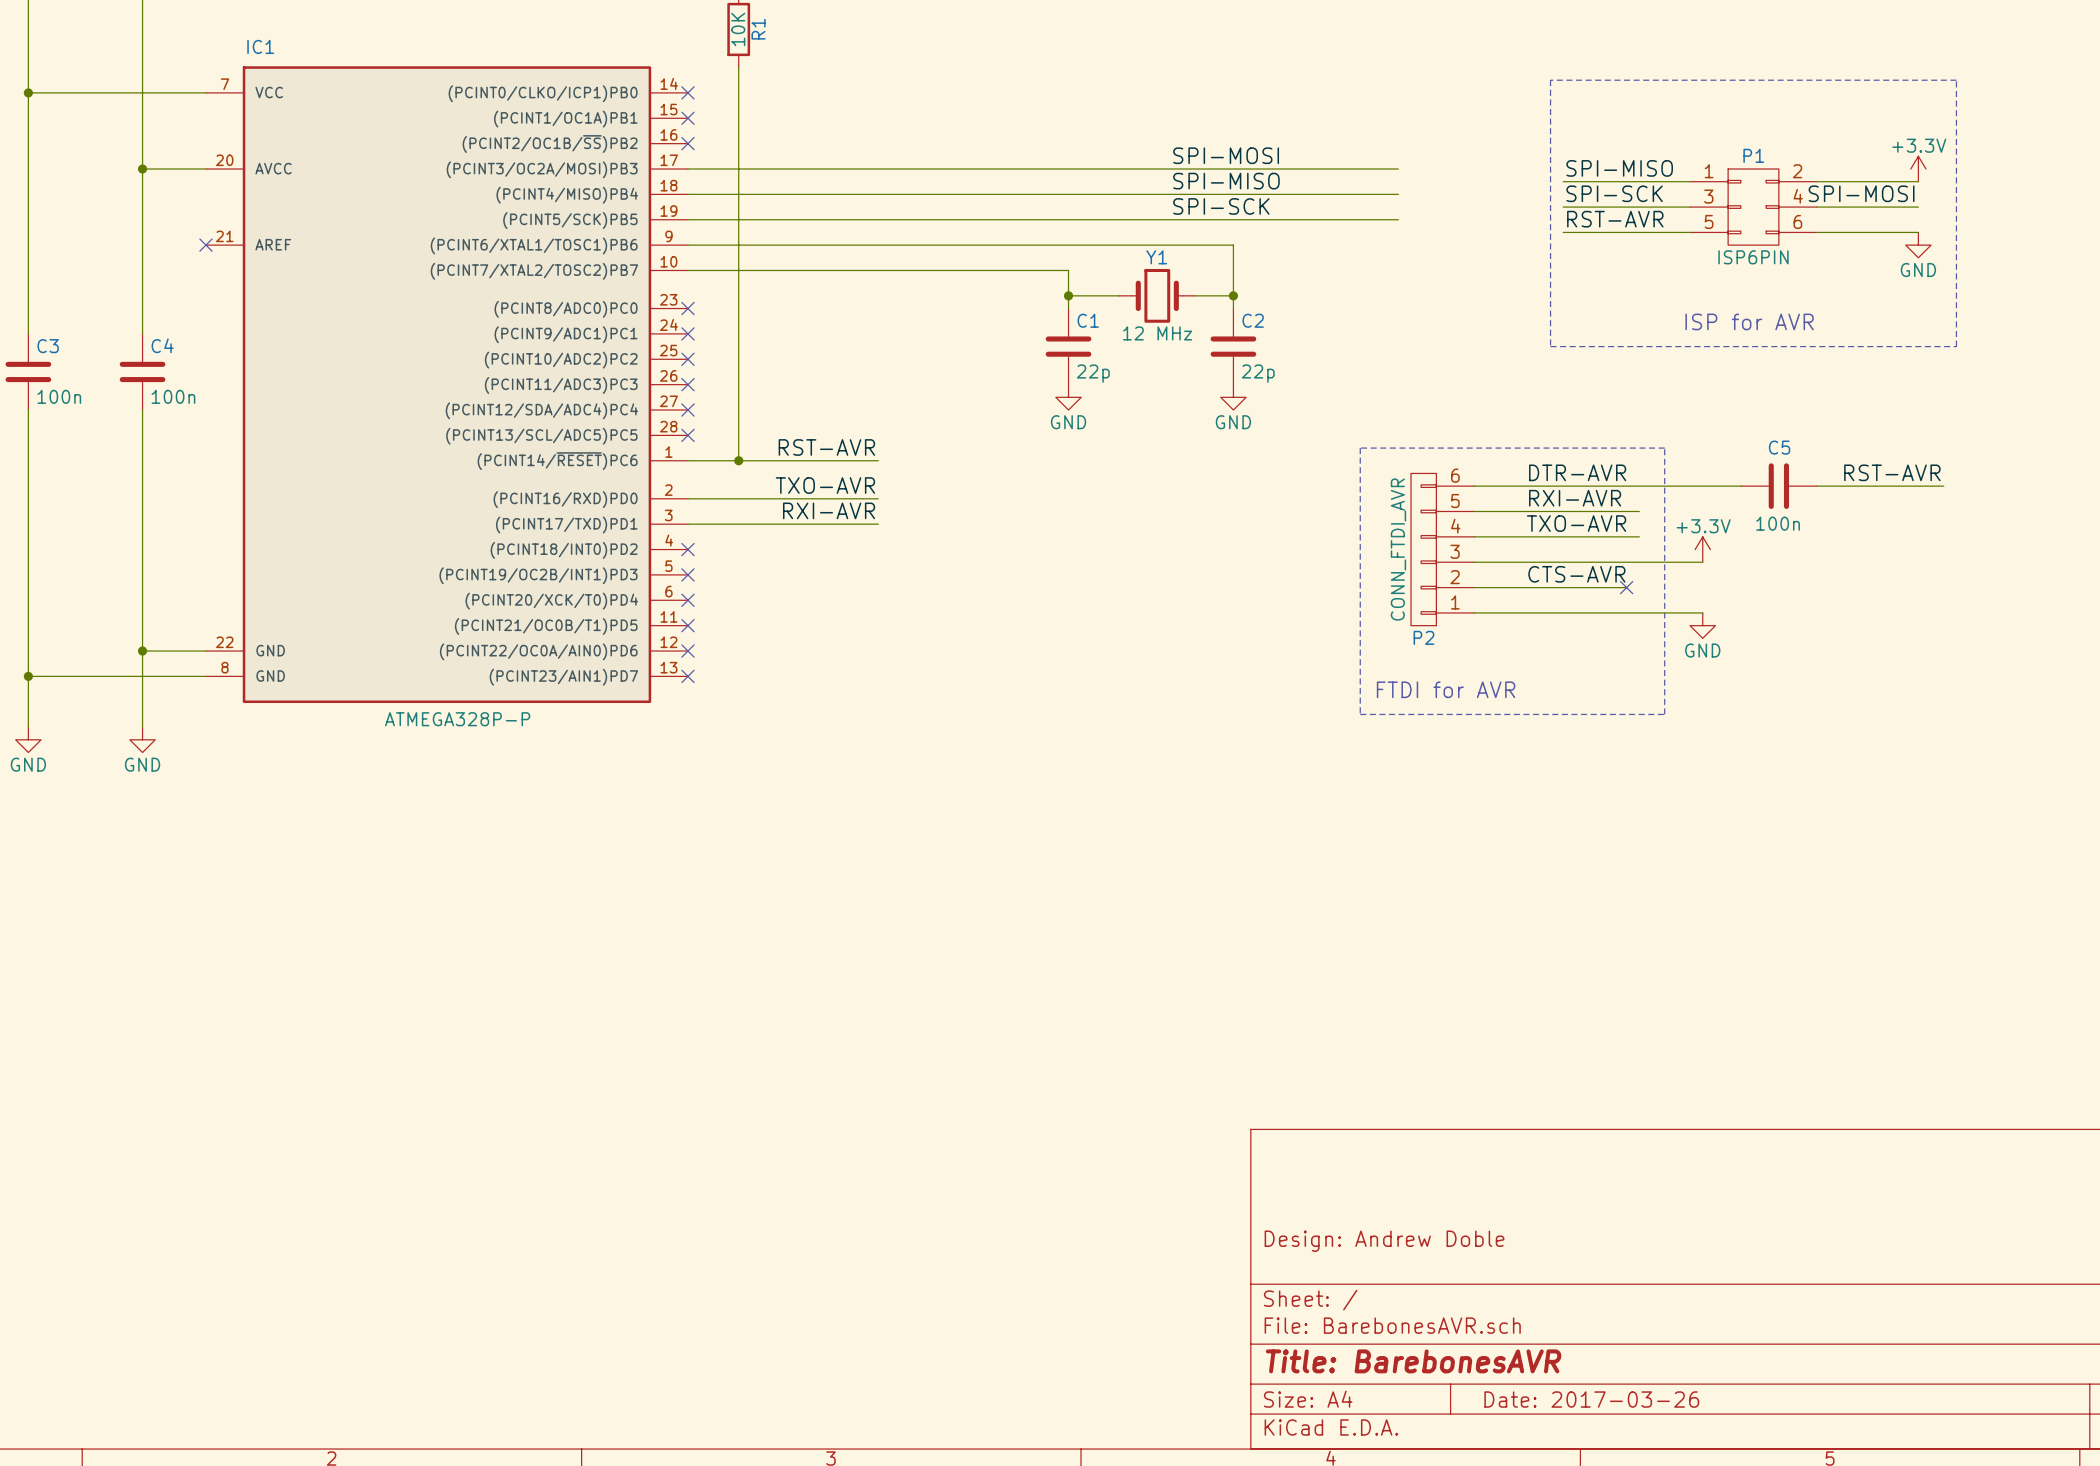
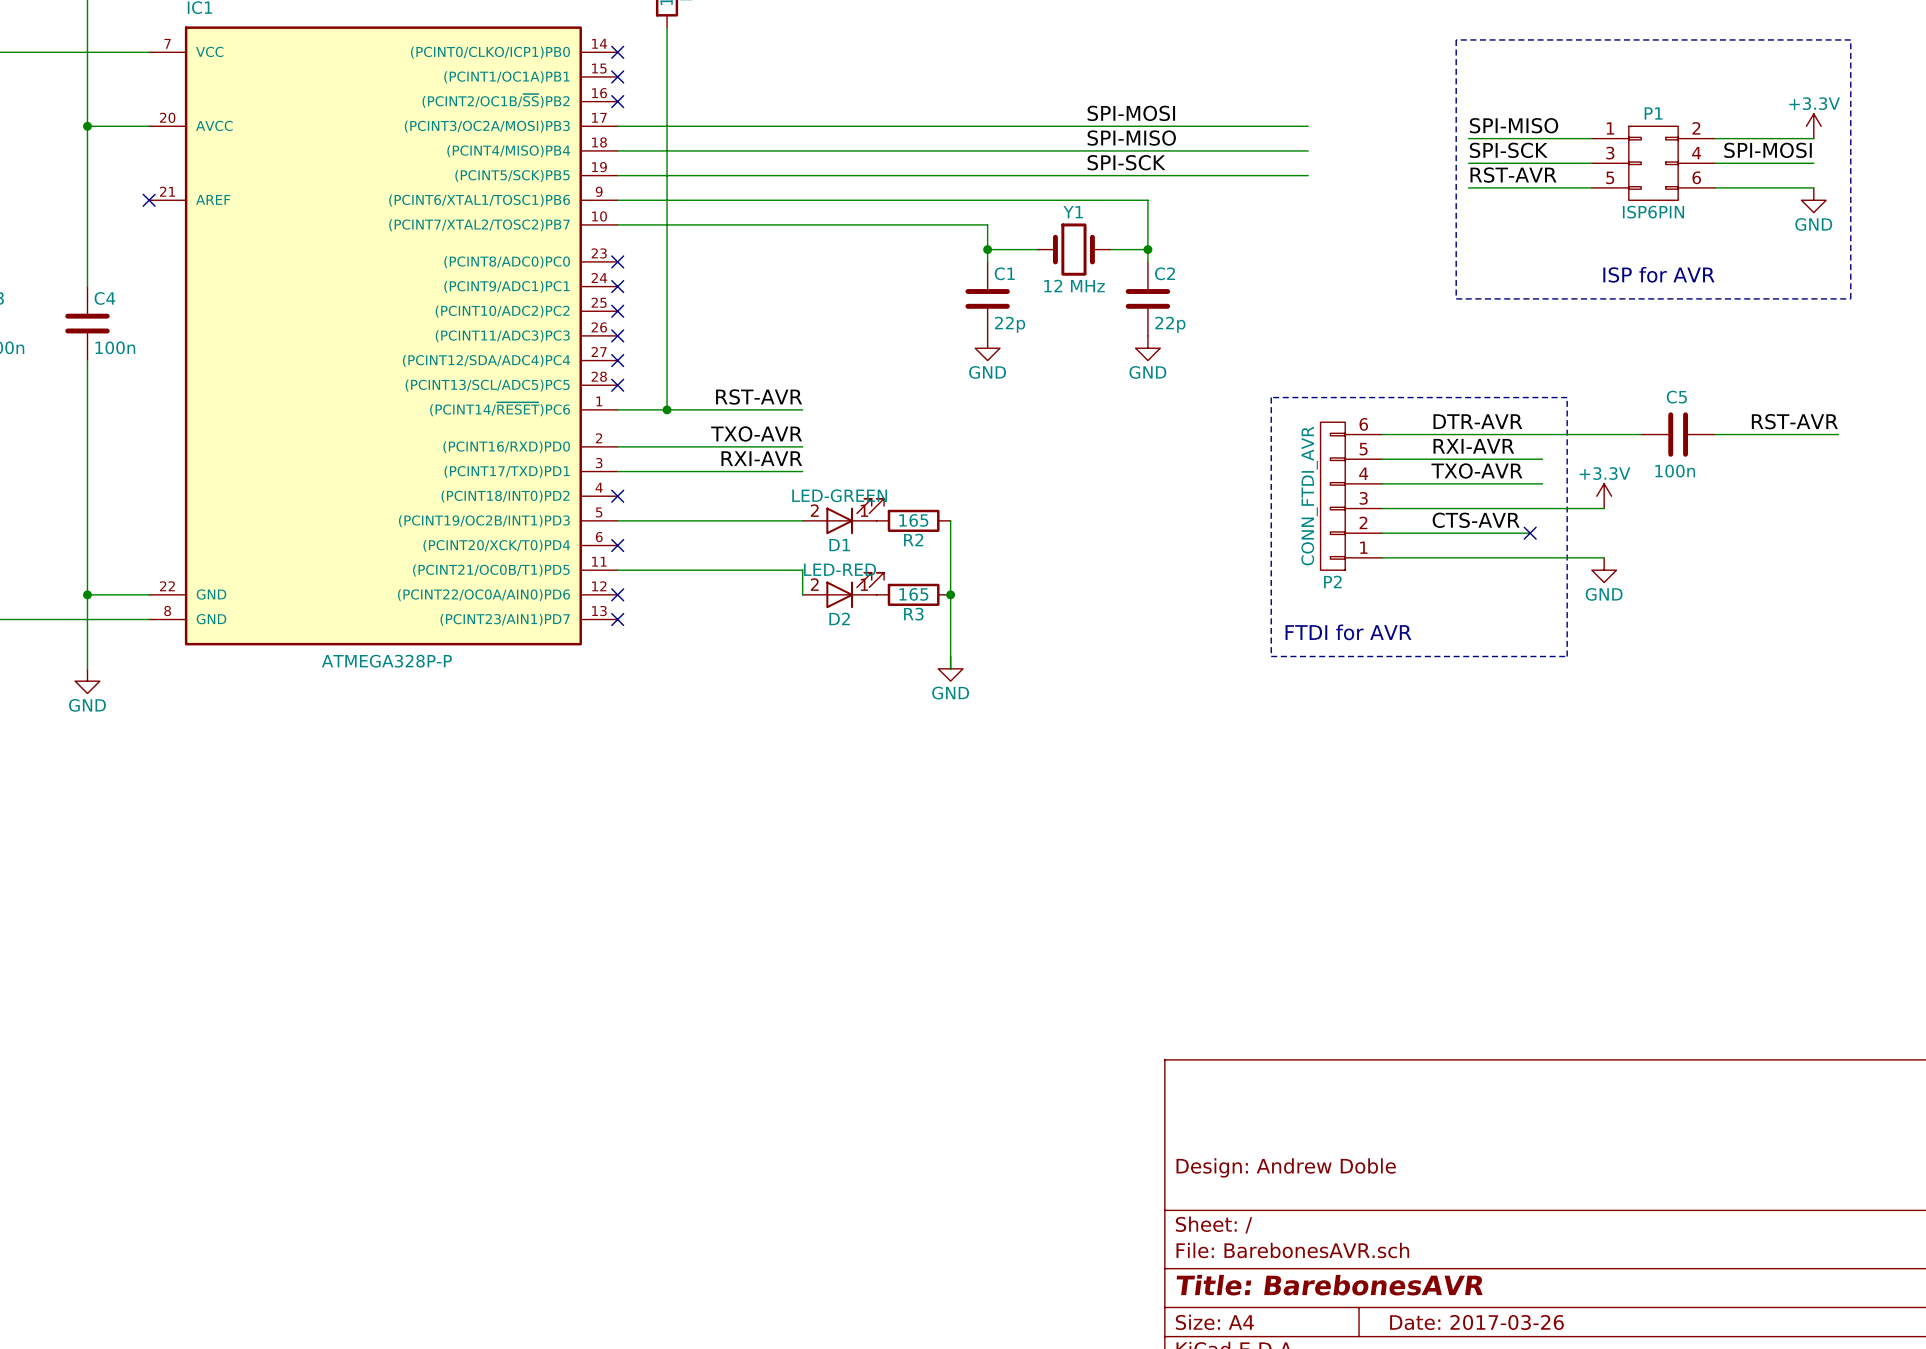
D1: none -> LED-GREEN (843, 516)
wire: none -> (617, 520) (802, 520)
no-connect mark: (687, 574) -> none
R2: none -> 165 (913, 520)
wire: none -> (950, 520) (950, 668)
wire: none -> (617, 570) (802, 570) (802, 594)
no-connect mark: (687, 625) -> none
D2: none -> LED-RED (843, 590)
R3: none -> 165 (913, 594)
junction: none -> (950, 594)
power symbol: none -> GND (950, 668)

